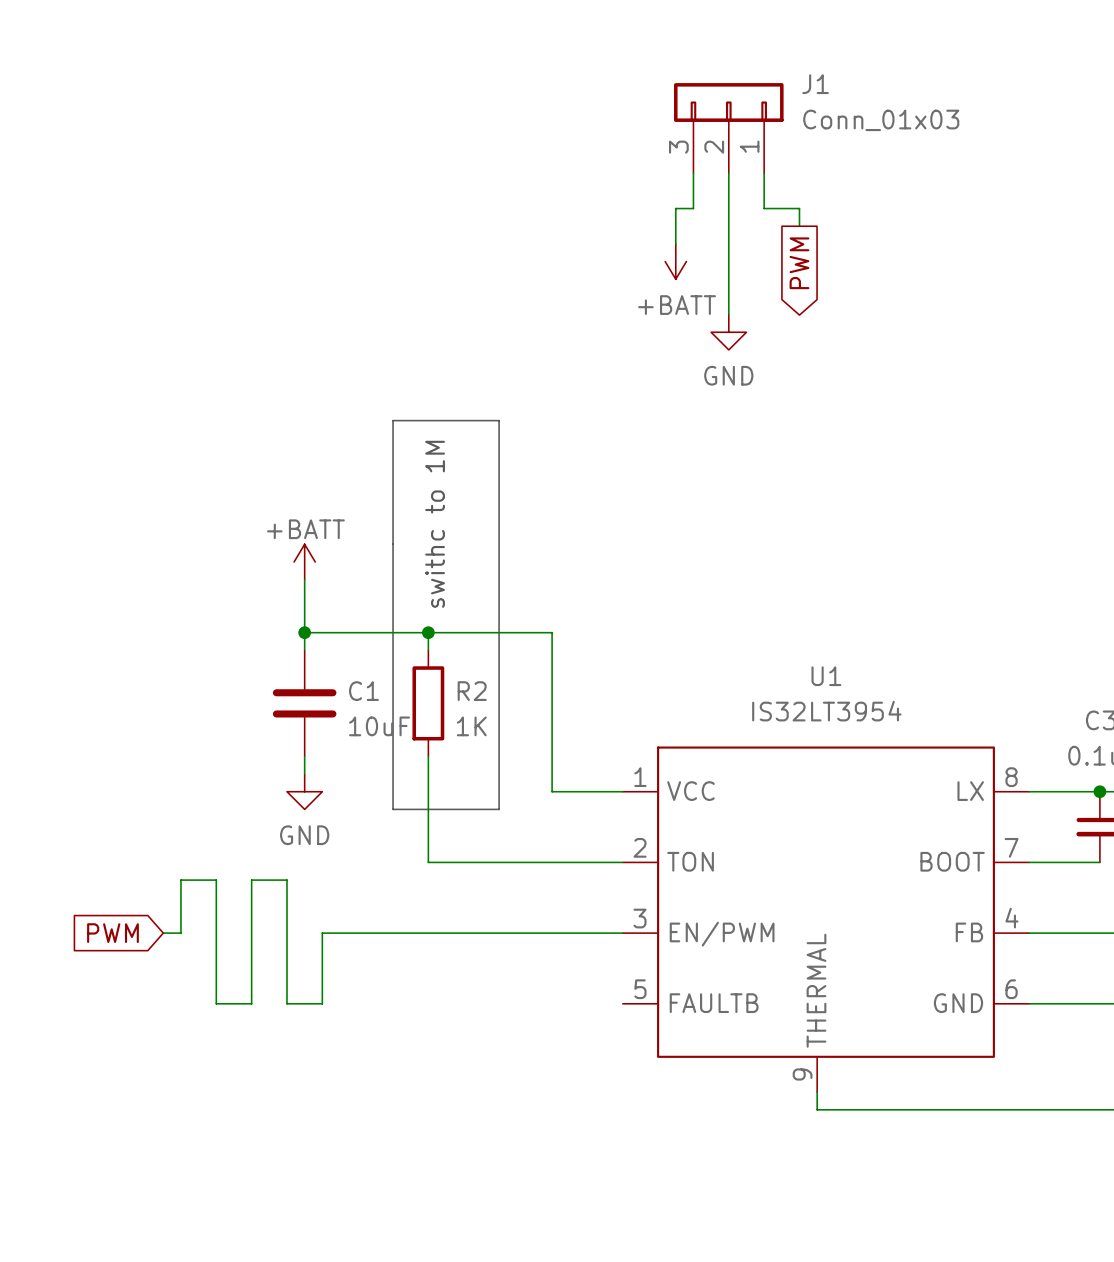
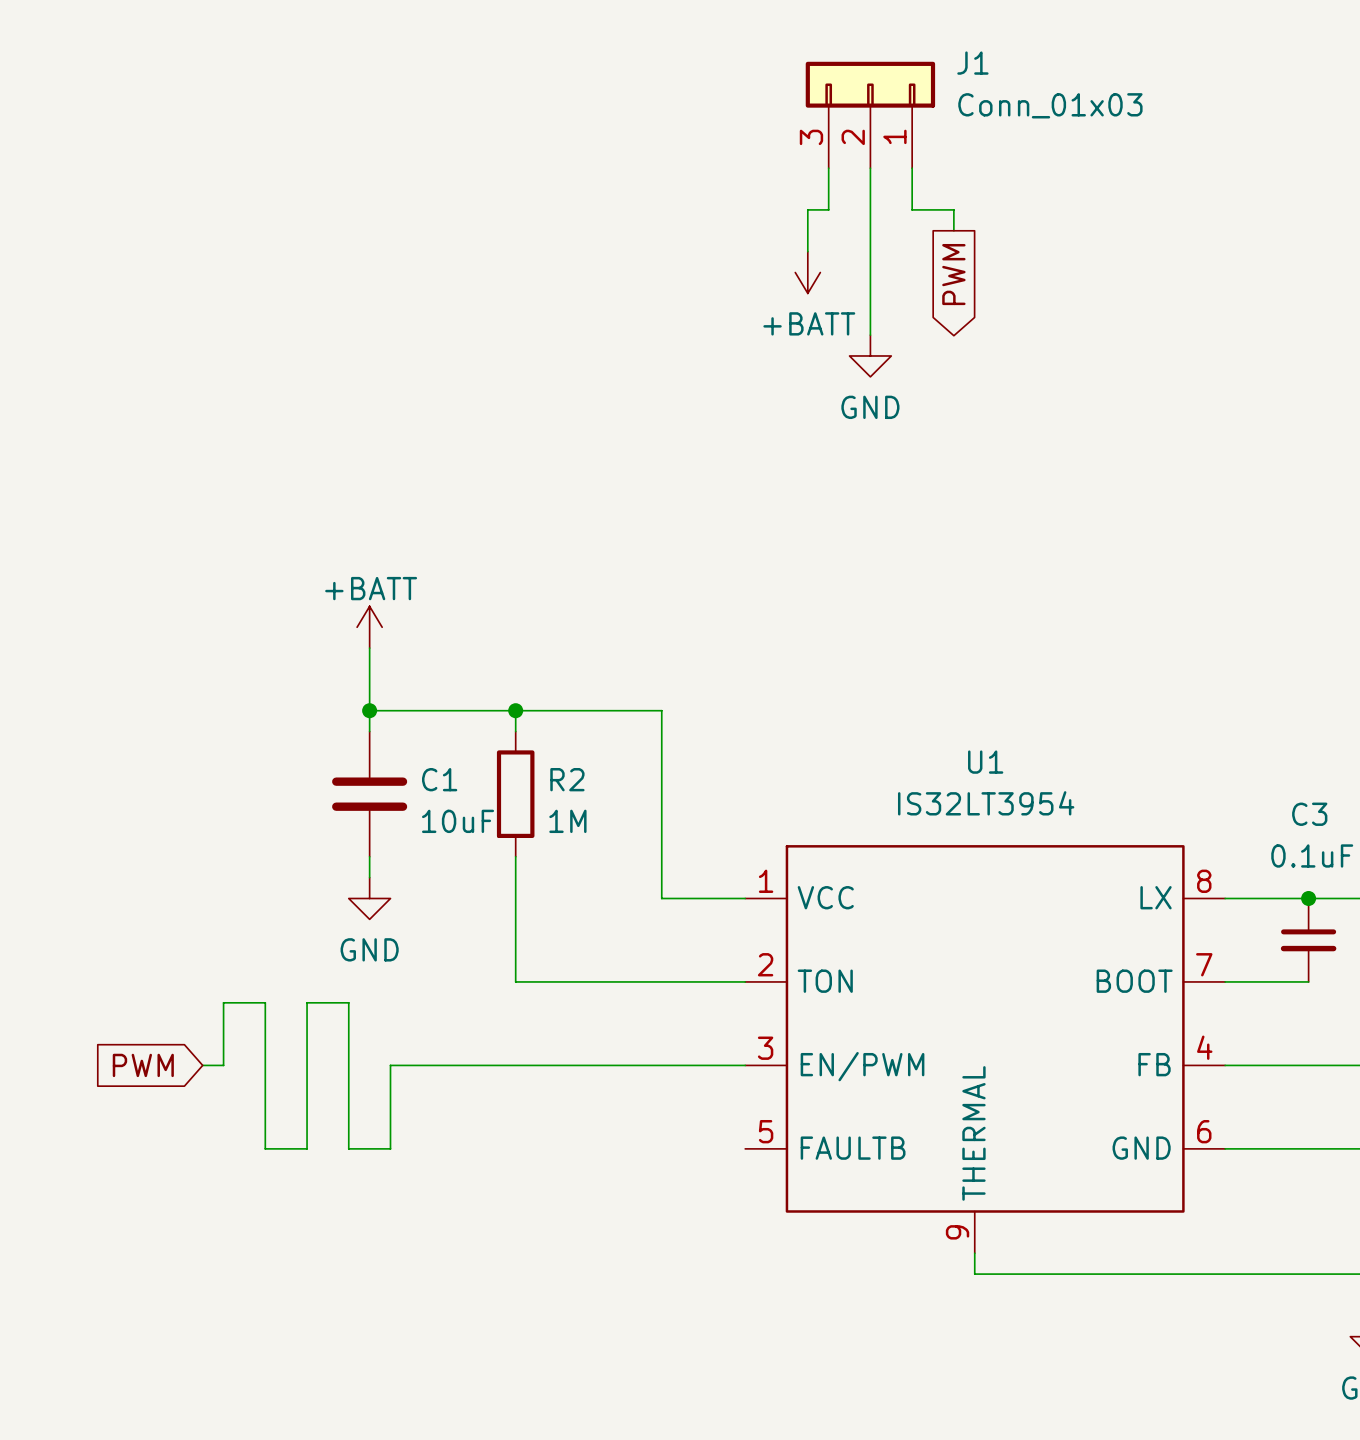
line: (393, 420) (393, 809) (499, 809) (499, 420) (393, 420) -> none
text: swithc to 1M (435, 524) -> none
R2 value: 1K (471, 726) -> 1M (567, 821)

